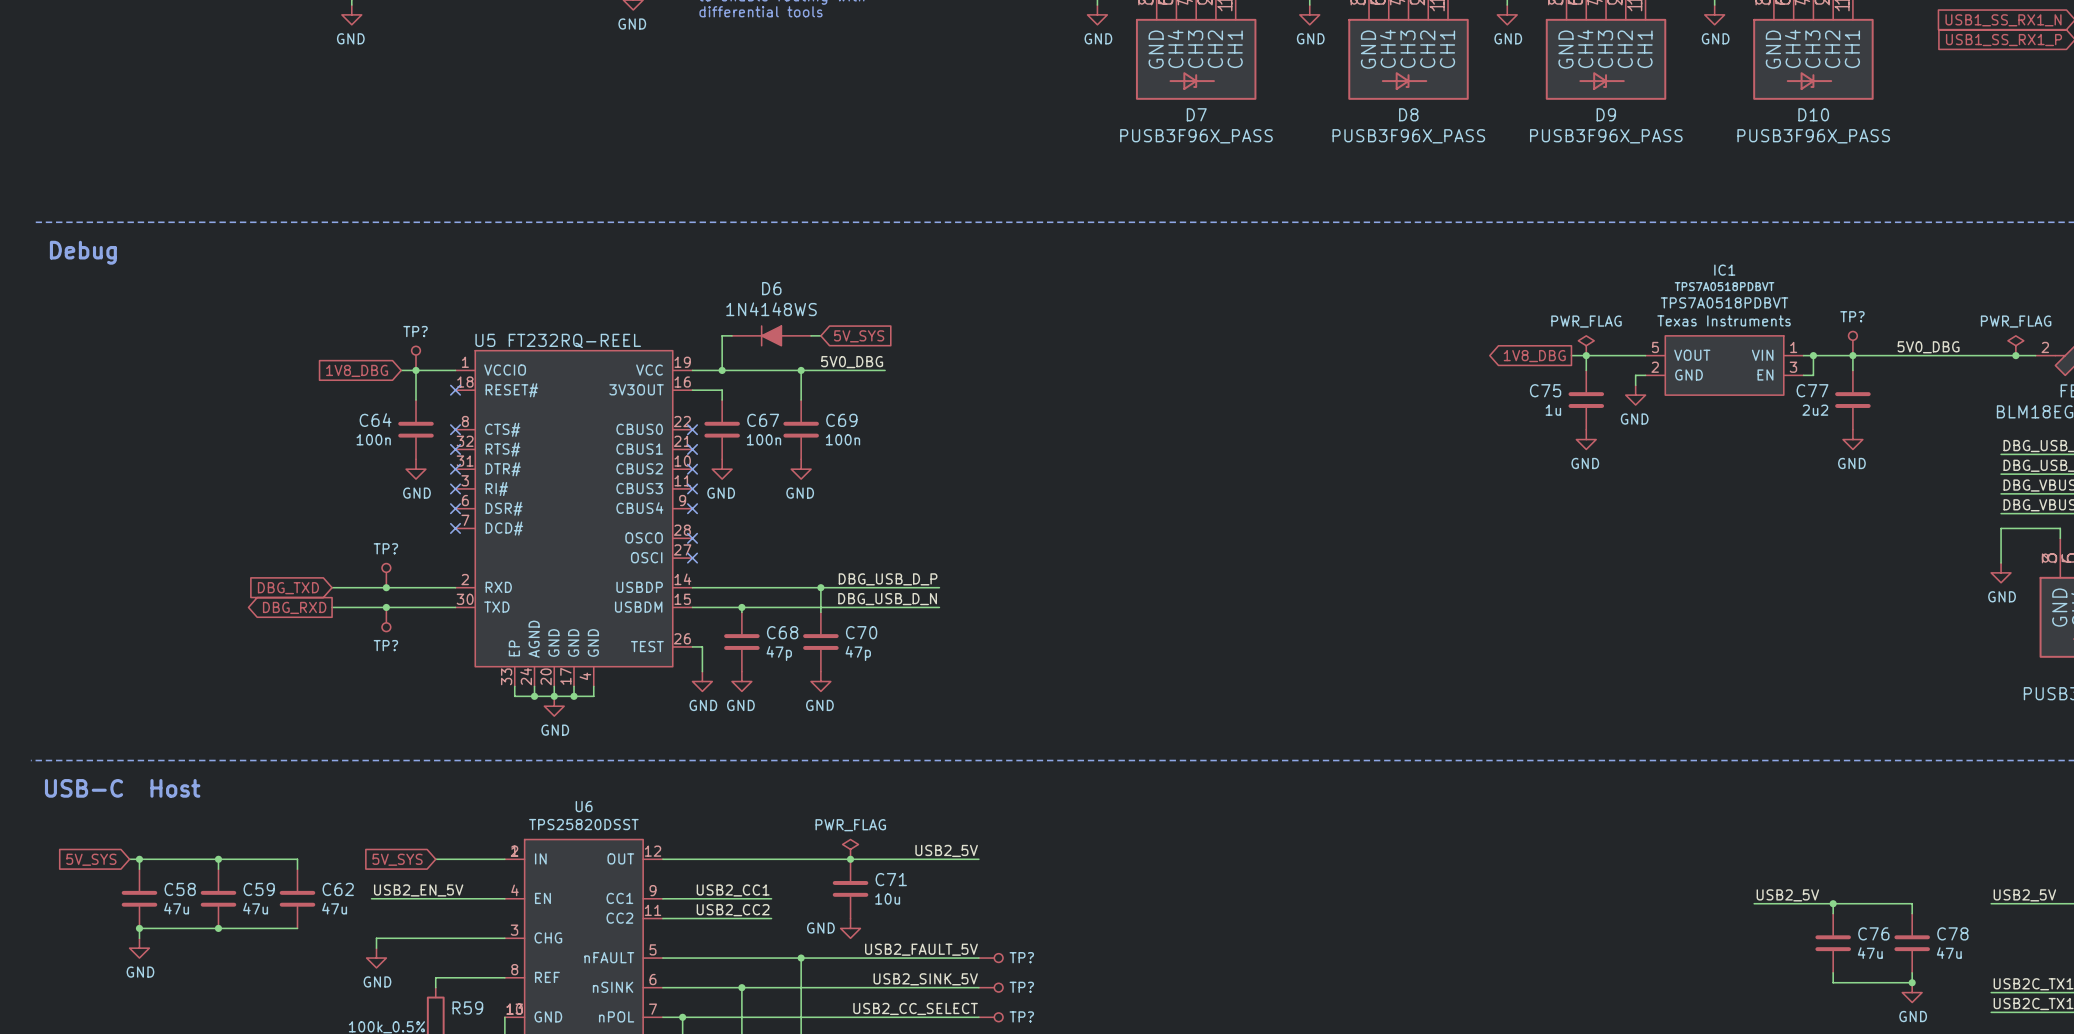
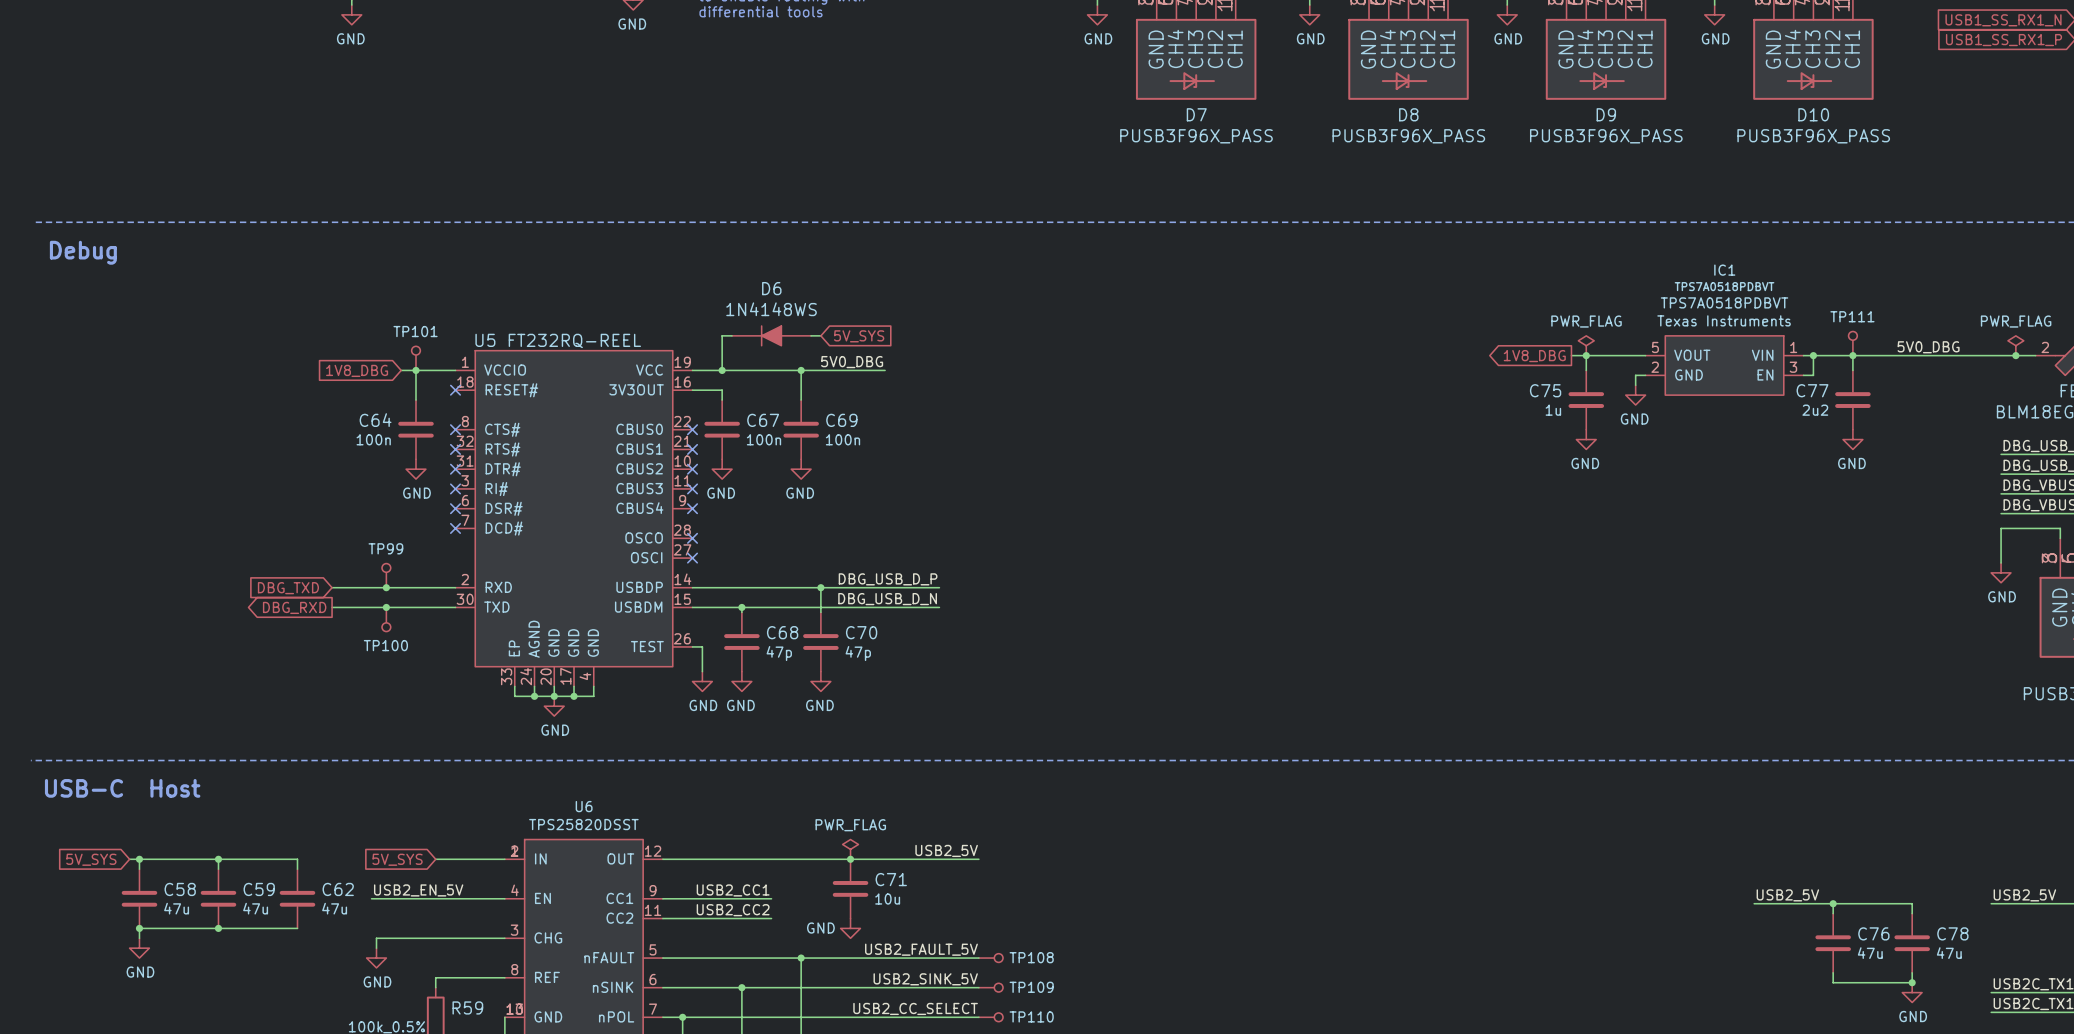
TP? name: TP? (1852, 316) -> TP111 (1852, 316)
TP? name: TP? (415, 331) -> TP101 (415, 331)
TP? name: TP? (385, 548) -> TP99 (385, 548)
TP? name: TP? (385, 645) -> TP100 (385, 645)
TP? name: TP? (1021, 957) -> TP108 (1031, 957)
TP? name: TP? (1021, 987) -> TP109 (1031, 987)
TP? name: TP? (1021, 1016) -> TP110 (1031, 1016)

